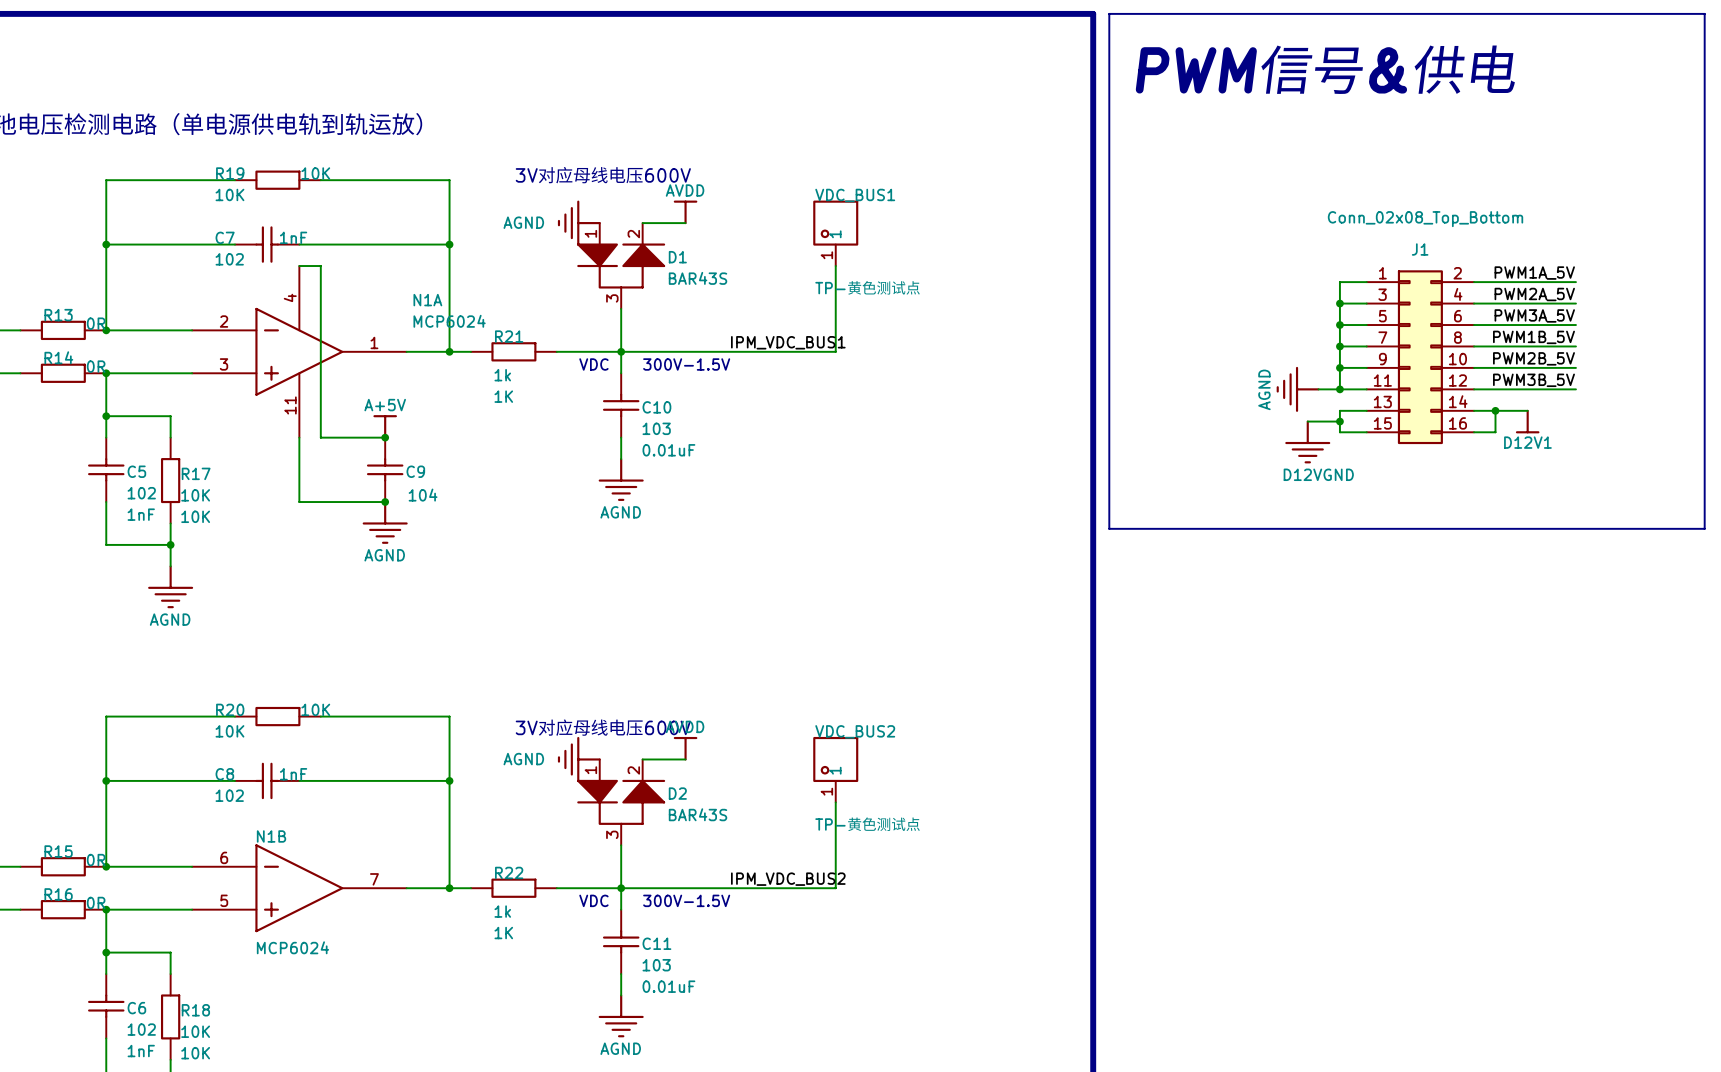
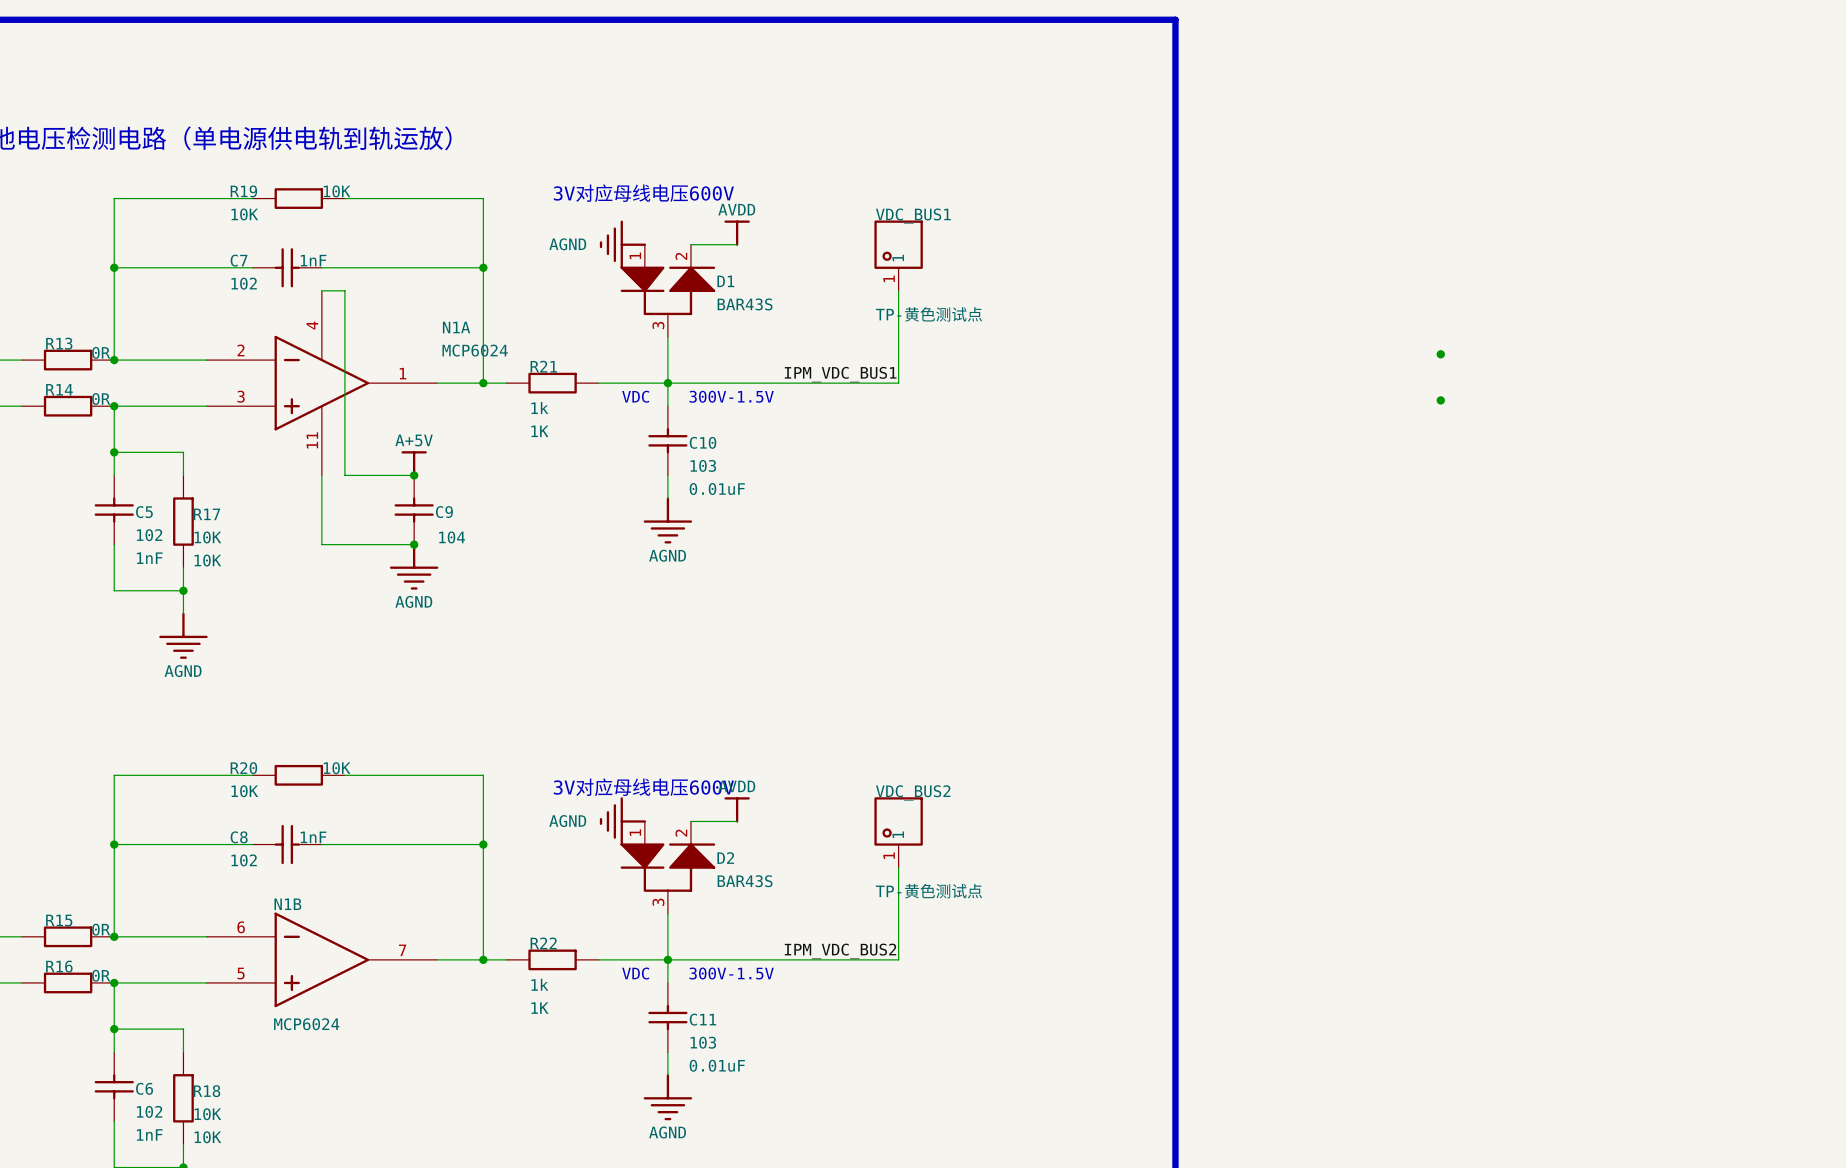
line: (1109, 13) (1704, 13) (1704, 528) (1109, 528) (1109, 13) -> none
text: PWM信号&供电 (1327, 69) -> none
label: PWM1A_5V (1534, 273) -> none
wire: (1366, 282) (1339, 282) (1339, 389) -> none
wire: (1474, 282) (1575, 282) -> none
label: PWM2A_5V (1534, 294) -> none
wire: (1339, 303) (1366, 303) -> none
junction: (1339, 303) -> none
wire: (1474, 303) (1575, 303) -> none
label: PWM3A_5V (1534, 315) -> none
wire: (1339, 325) (1366, 325) -> none
wire: (1474, 325) (1575, 325) -> none
label: PWM1B_5V (1533, 337) -> none
wire: (1339, 346) (1366, 346) -> none
junction: (1339, 346) -> none
wire: (1474, 346) (1575, 346) -> none
J1: Conn_02x08_Top_Bottom (1420, 357) -> none
label: PWM2B_5V (1533, 358) -> none
wire: (1339, 367) (1366, 367) -> none
wire: (1474, 367) (1575, 367) -> none
label: PWM3B_5V (1533, 380) -> none
power symbol: AGND (1298, 389) -> none
wire: (1318, 389) (1366, 389) -> none
junction: (1339, 389) -> none
wire: (1474, 389) (1575, 389) -> none
wire: (1366, 410) (1339, 410) (1339, 432) (1366, 432) -> none
wire: (1474, 410) (1527, 410) -> none
wire: (1495, 410) (1495, 432) (1474, 432) -> none
junction: (1495, 410) -> none
wire: (1307, 421) (1339, 421) -> none
junction: (1339, 421) -> none
power symbol: D12V1 (1527, 421) -> none
power symbol: D12VGND (1307, 441) -> none

